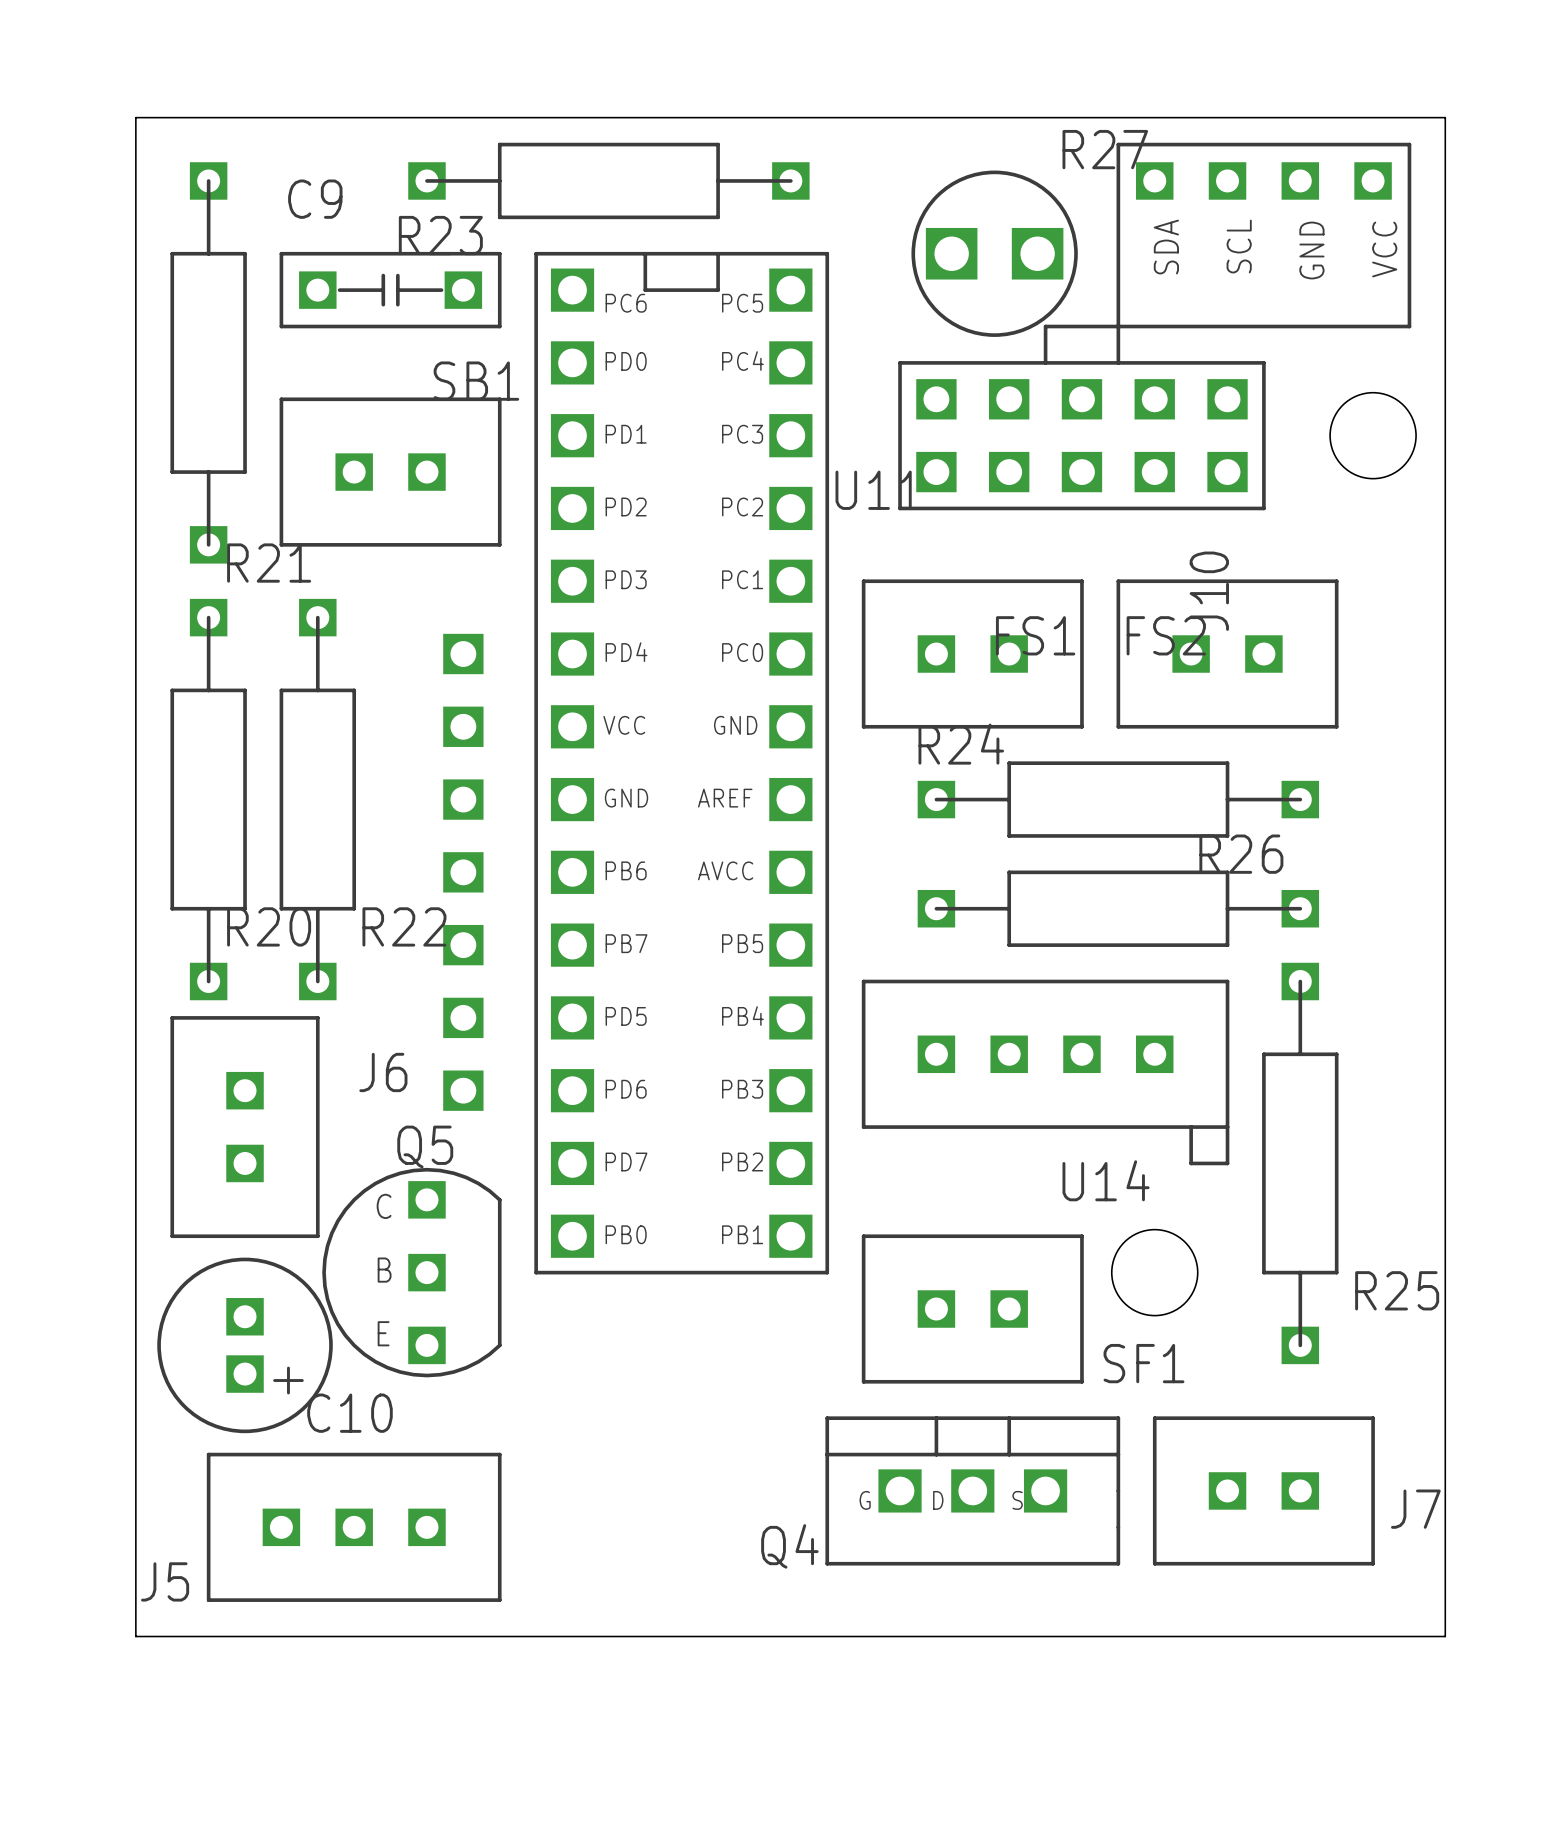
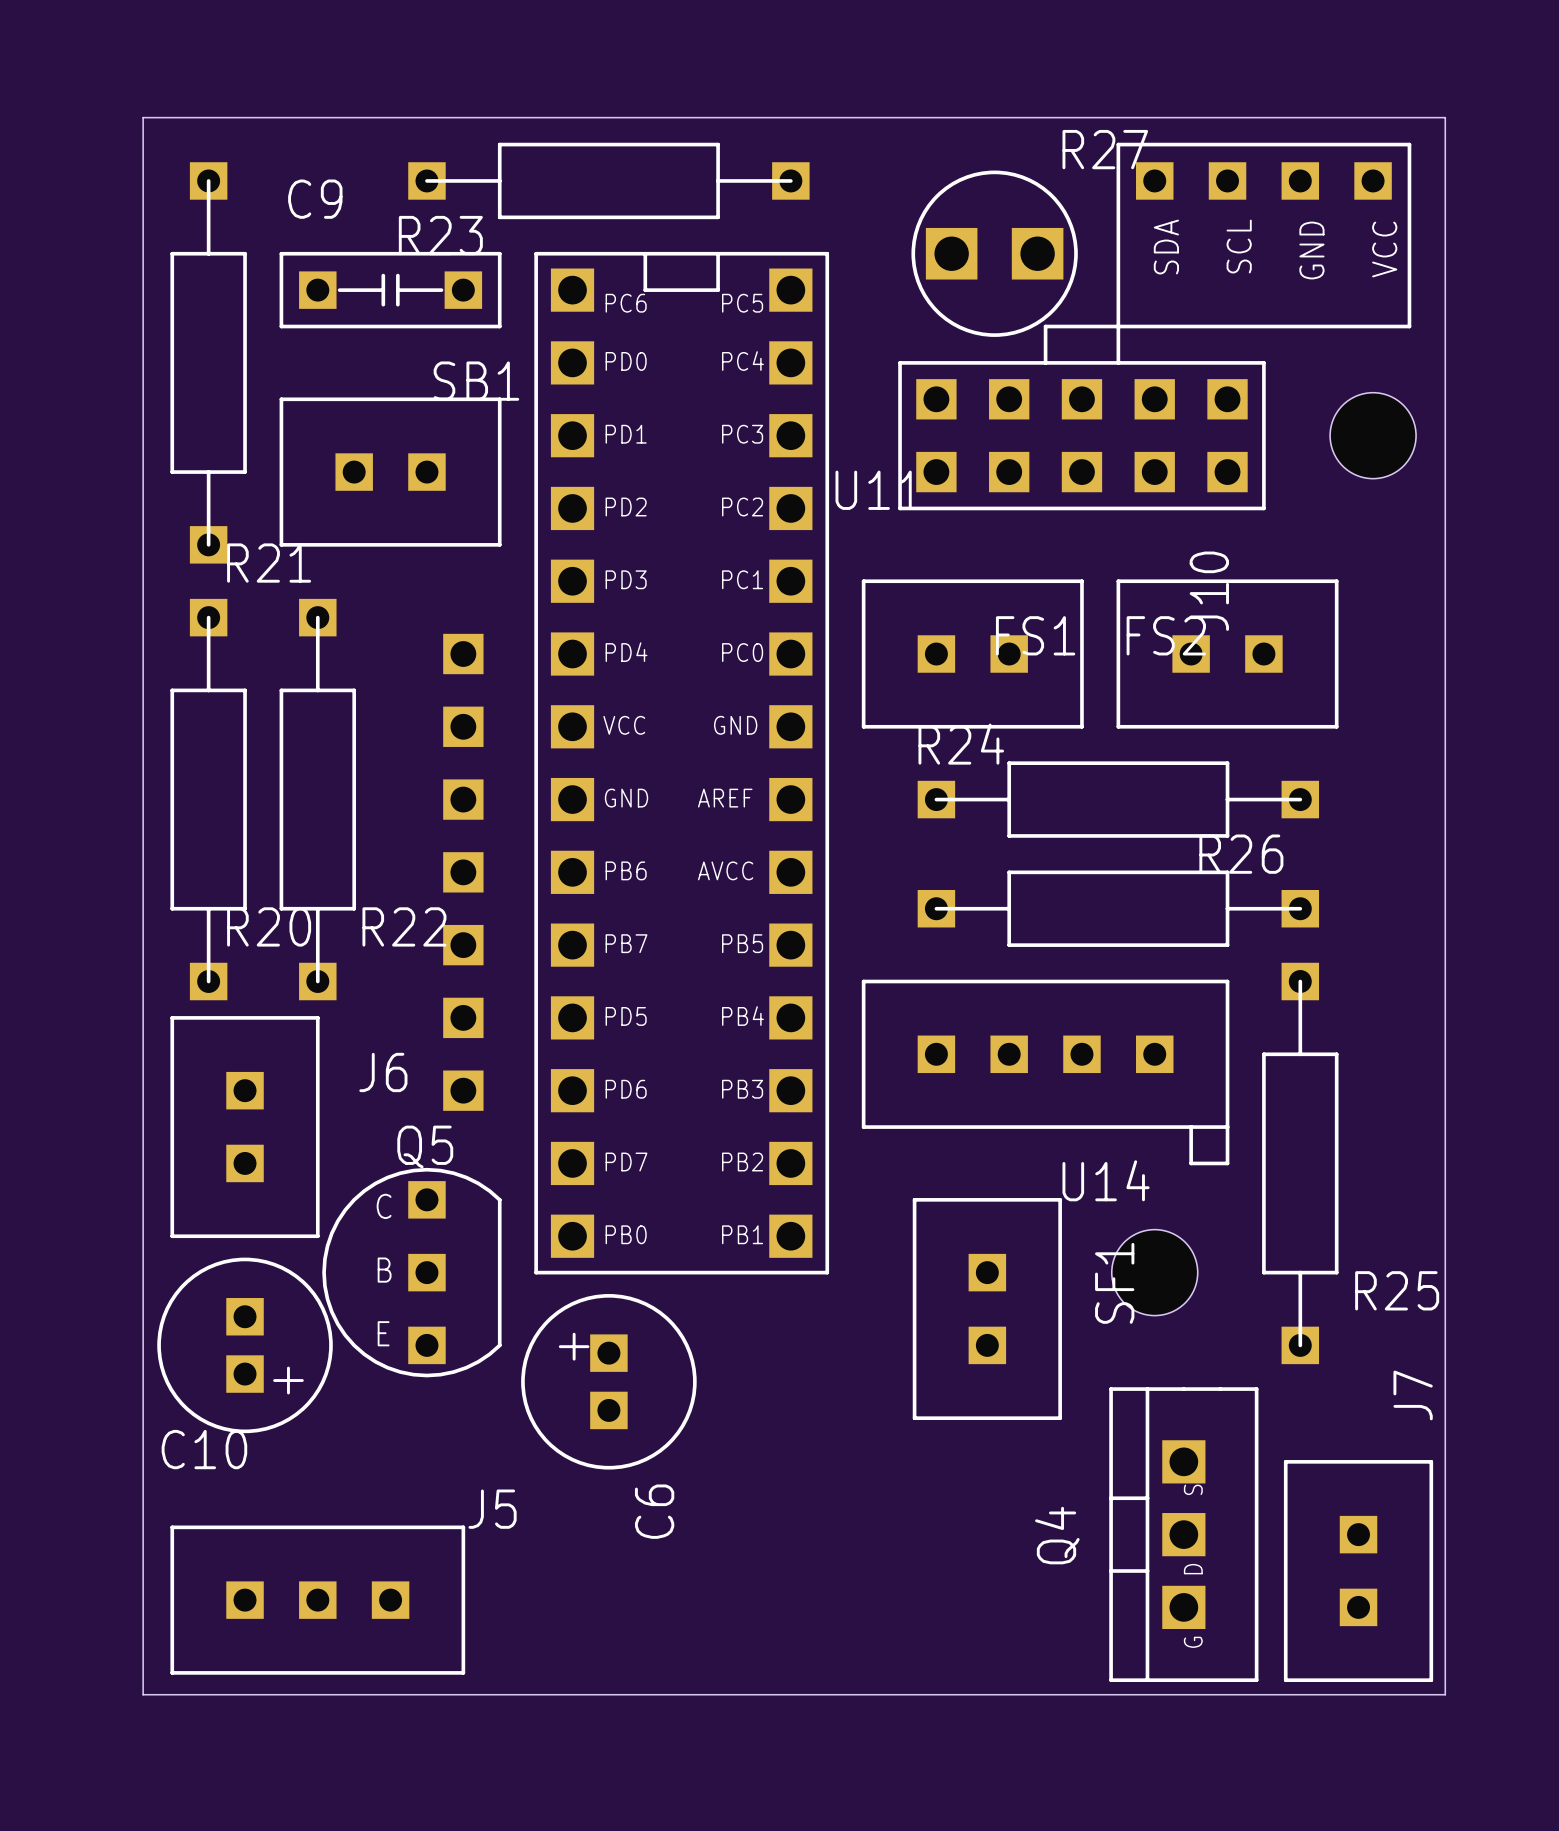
board edge: (143, 117) (135, 117) (135, 1636) (1445, 1636) -> (143, 117) (143, 1694) (1445, 1694) (1445, 1636)
SF1 rotation: 0° (972, 1309) -> 90° clockwise (987, 1309)
SF1 name position: SF1 (1143, 1363) -> SF1 (1114, 1283)
C6: none -> (608, 1381)
C10 name position: C10 (349, 1413) -> C10 (204, 1449)
Q4 rotation: 0° (972, 1490) -> 90° counterclockwise (1183, 1534)
Q4 position: (972, 1490) -> (1183, 1534)
J7 rotation: 0° (1263, 1490) -> 90° clockwise (1358, 1571)
J7 name position: J7 (1415, 1509) -> J7 (1413, 1395)
J5 position: (354, 1527) -> (317, 1600)
Q4 name position: Q4 (789, 1546) -> Q4 (1057, 1535)
J5 name position: J5 (165, 1581) -> J5 (492, 1509)

